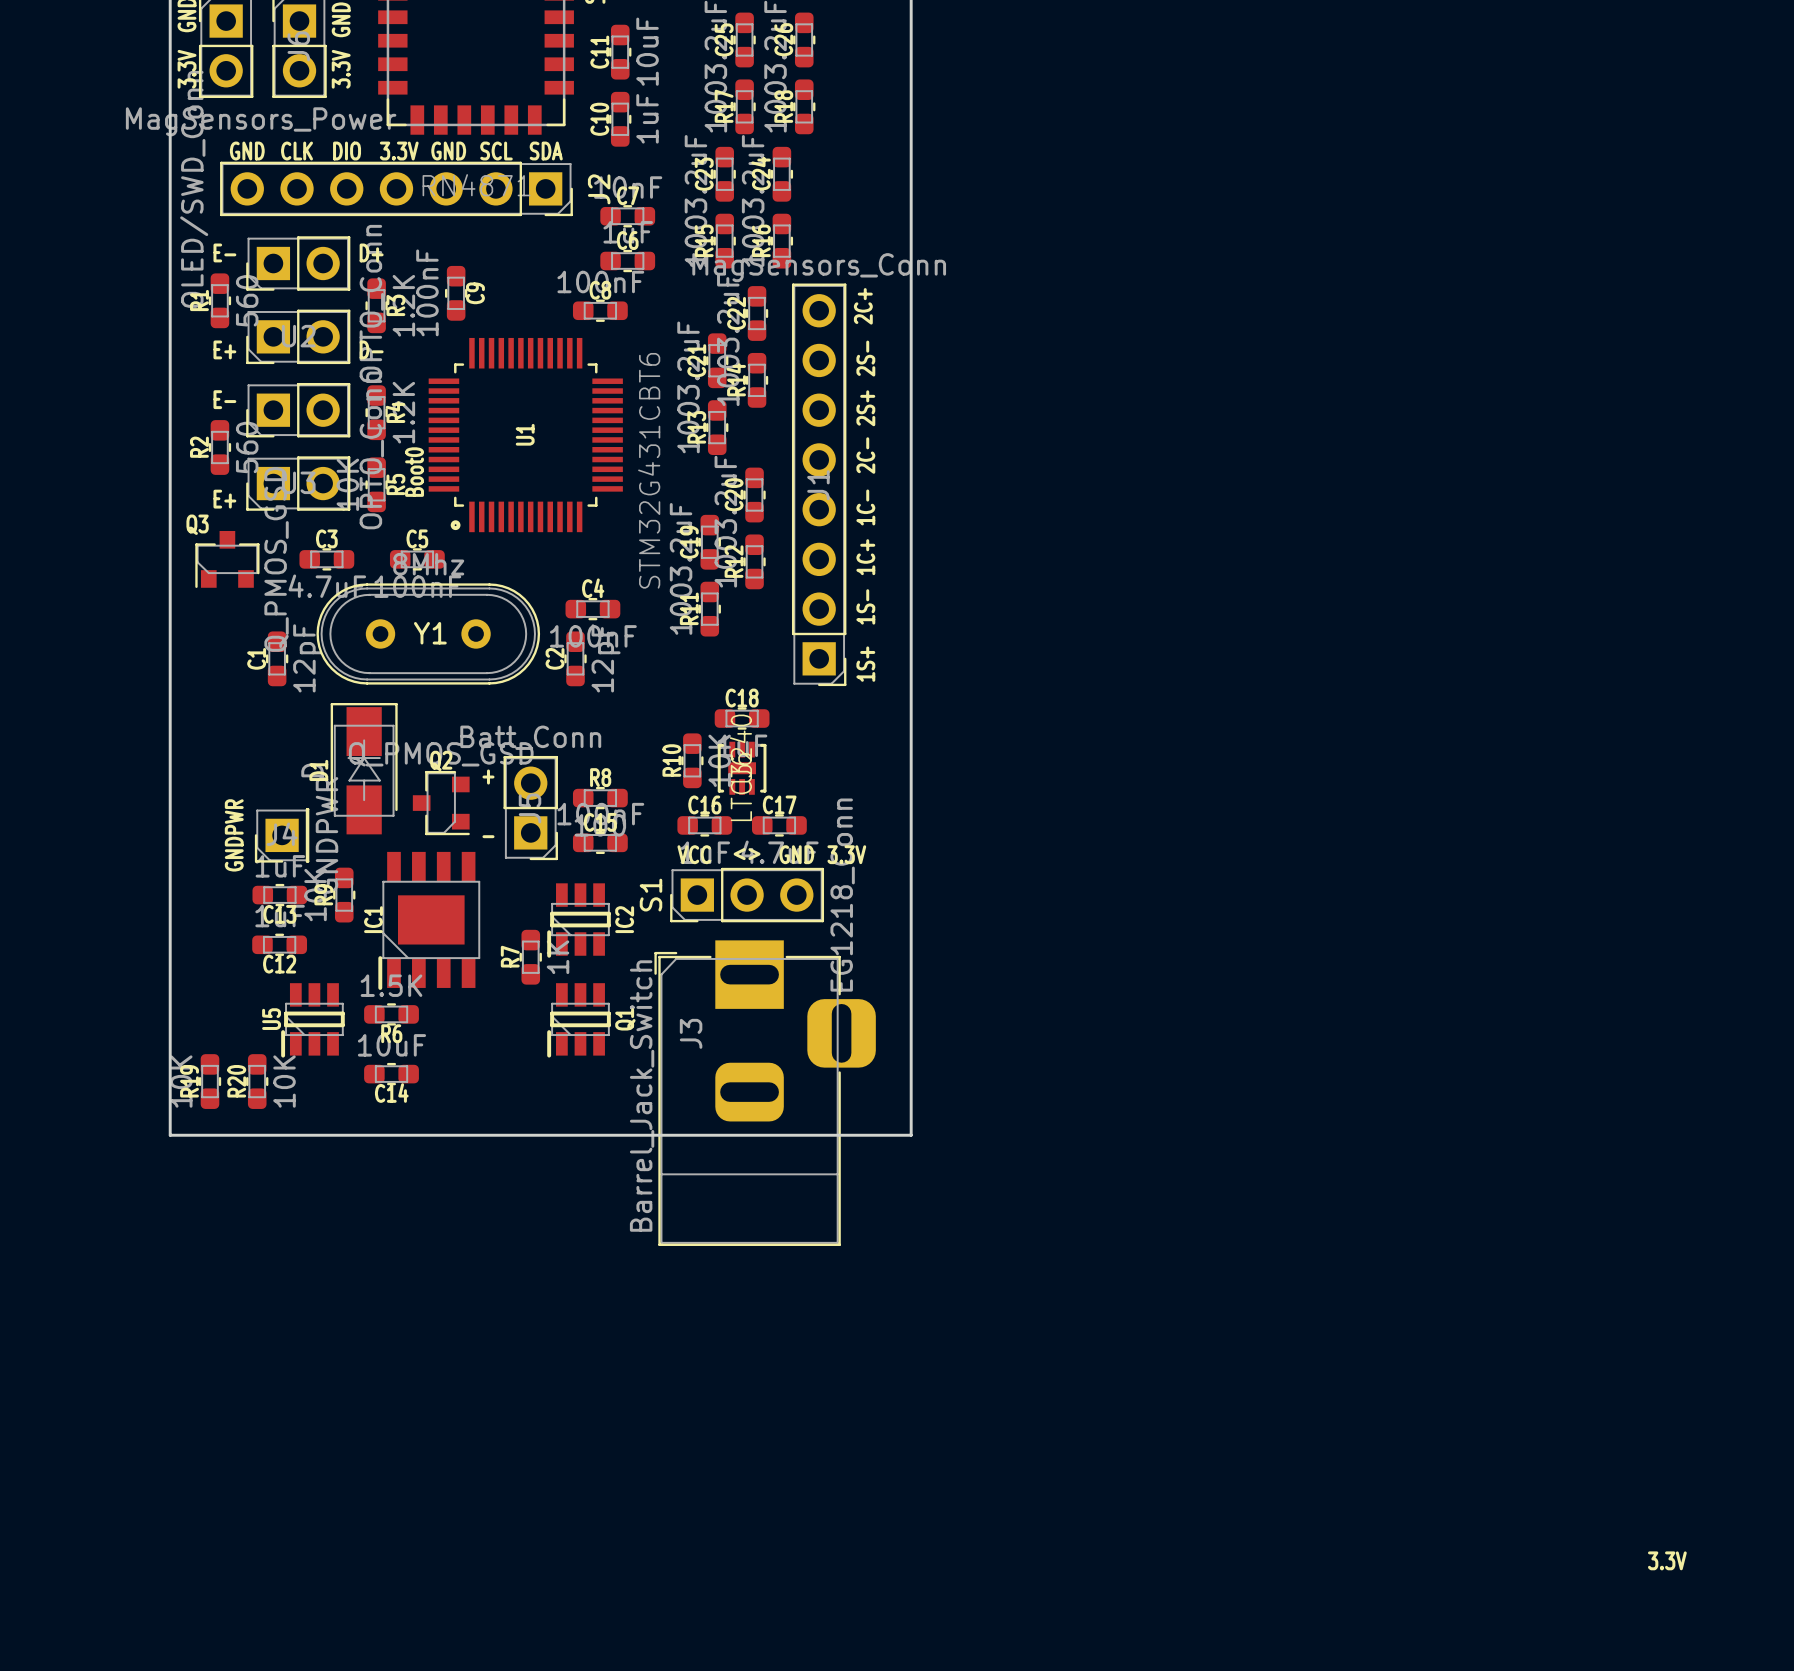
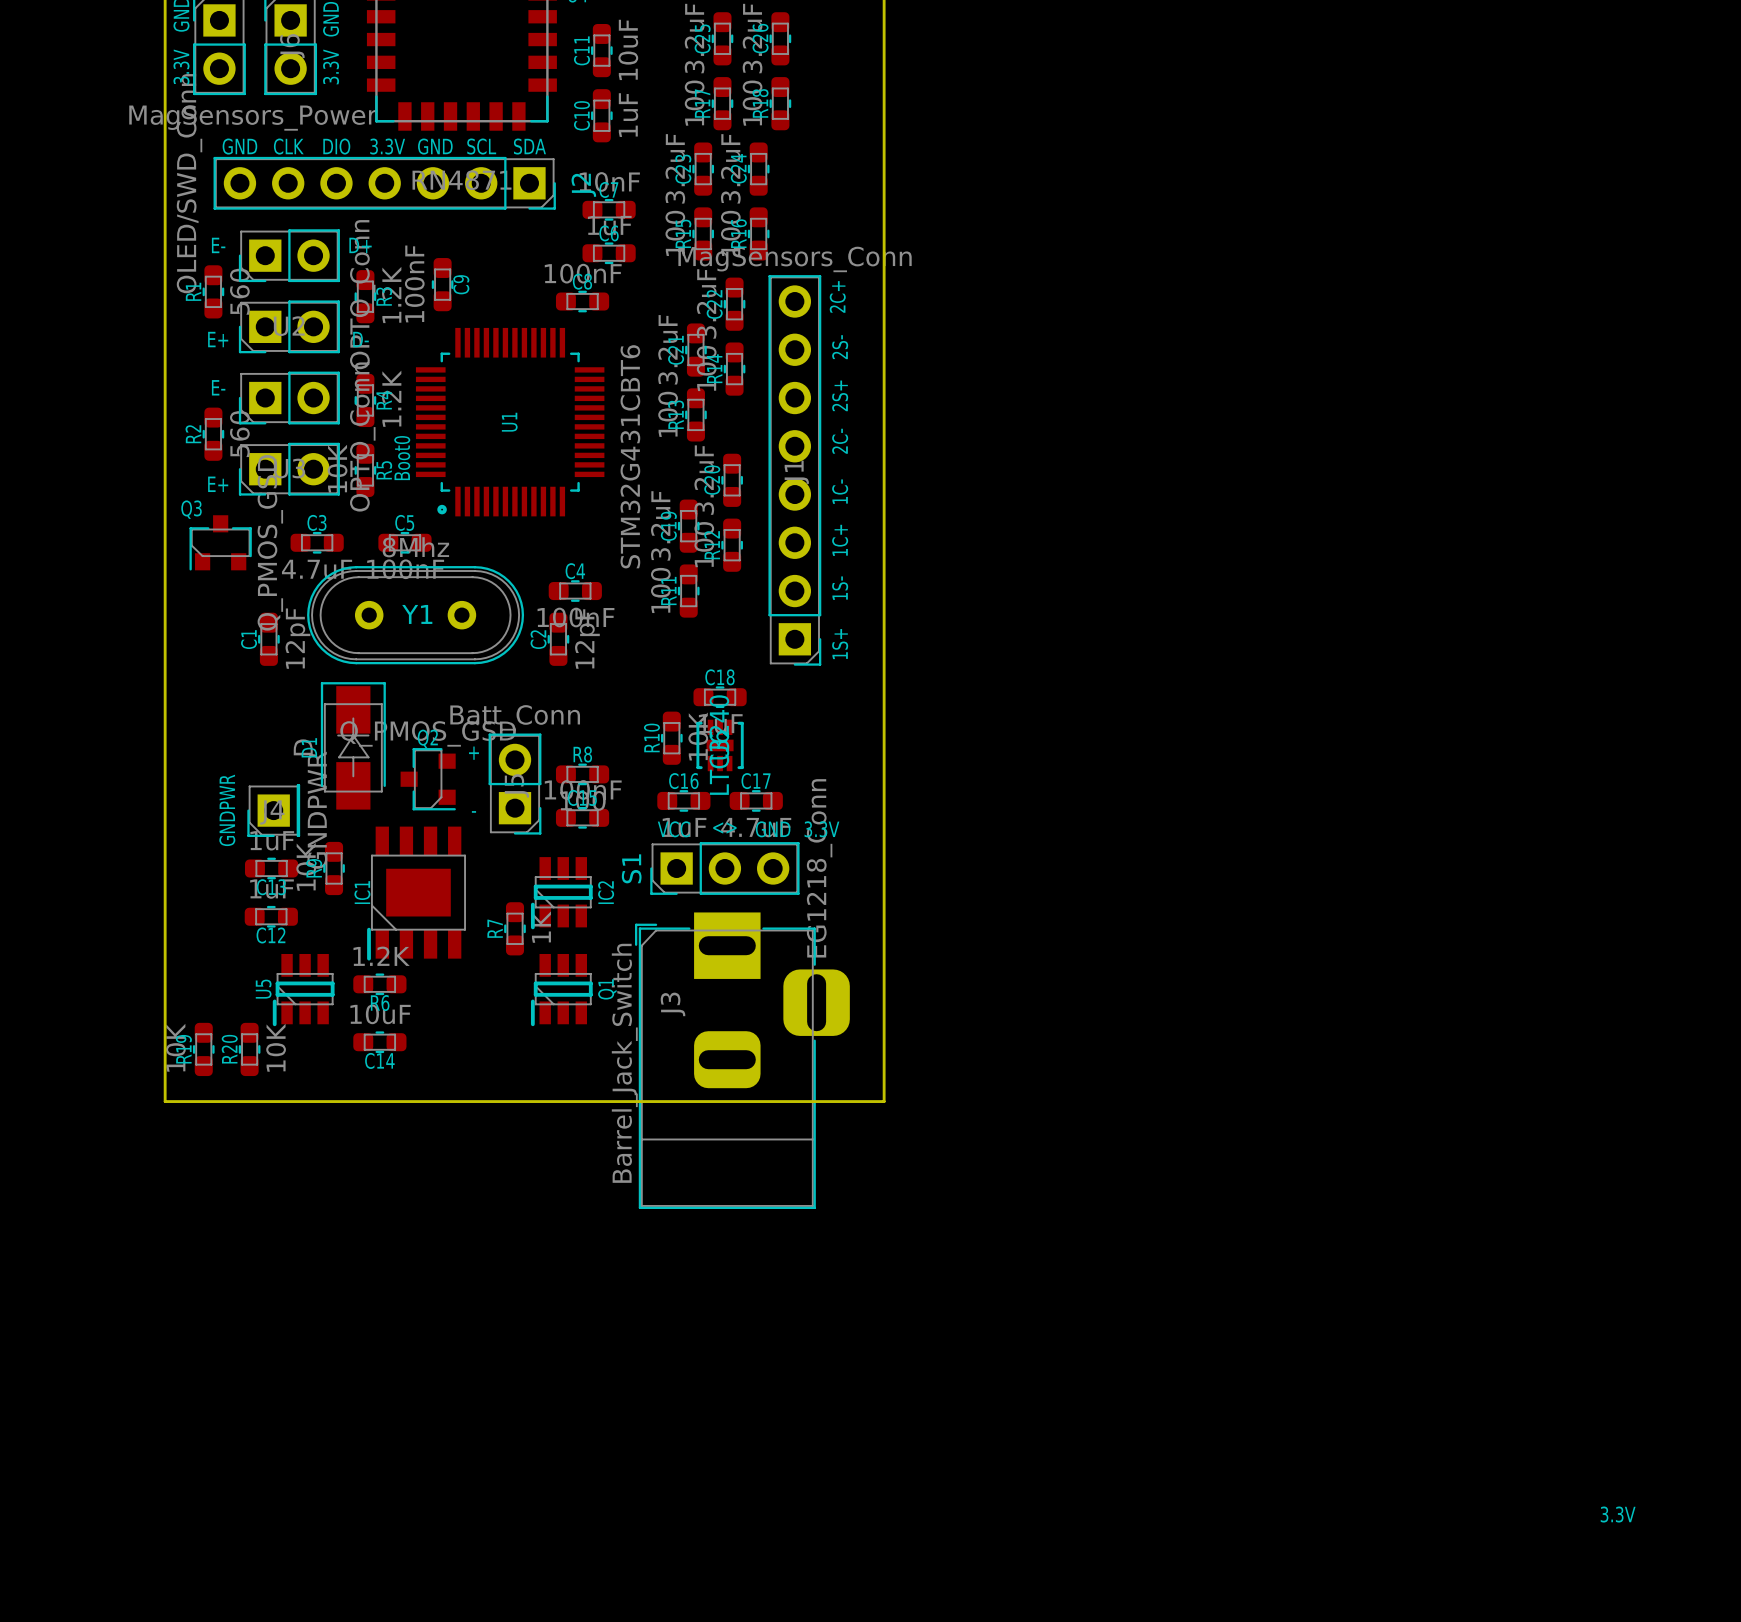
R6 value: 1.5K (391, 985) -> 1.2K (381, 956)

